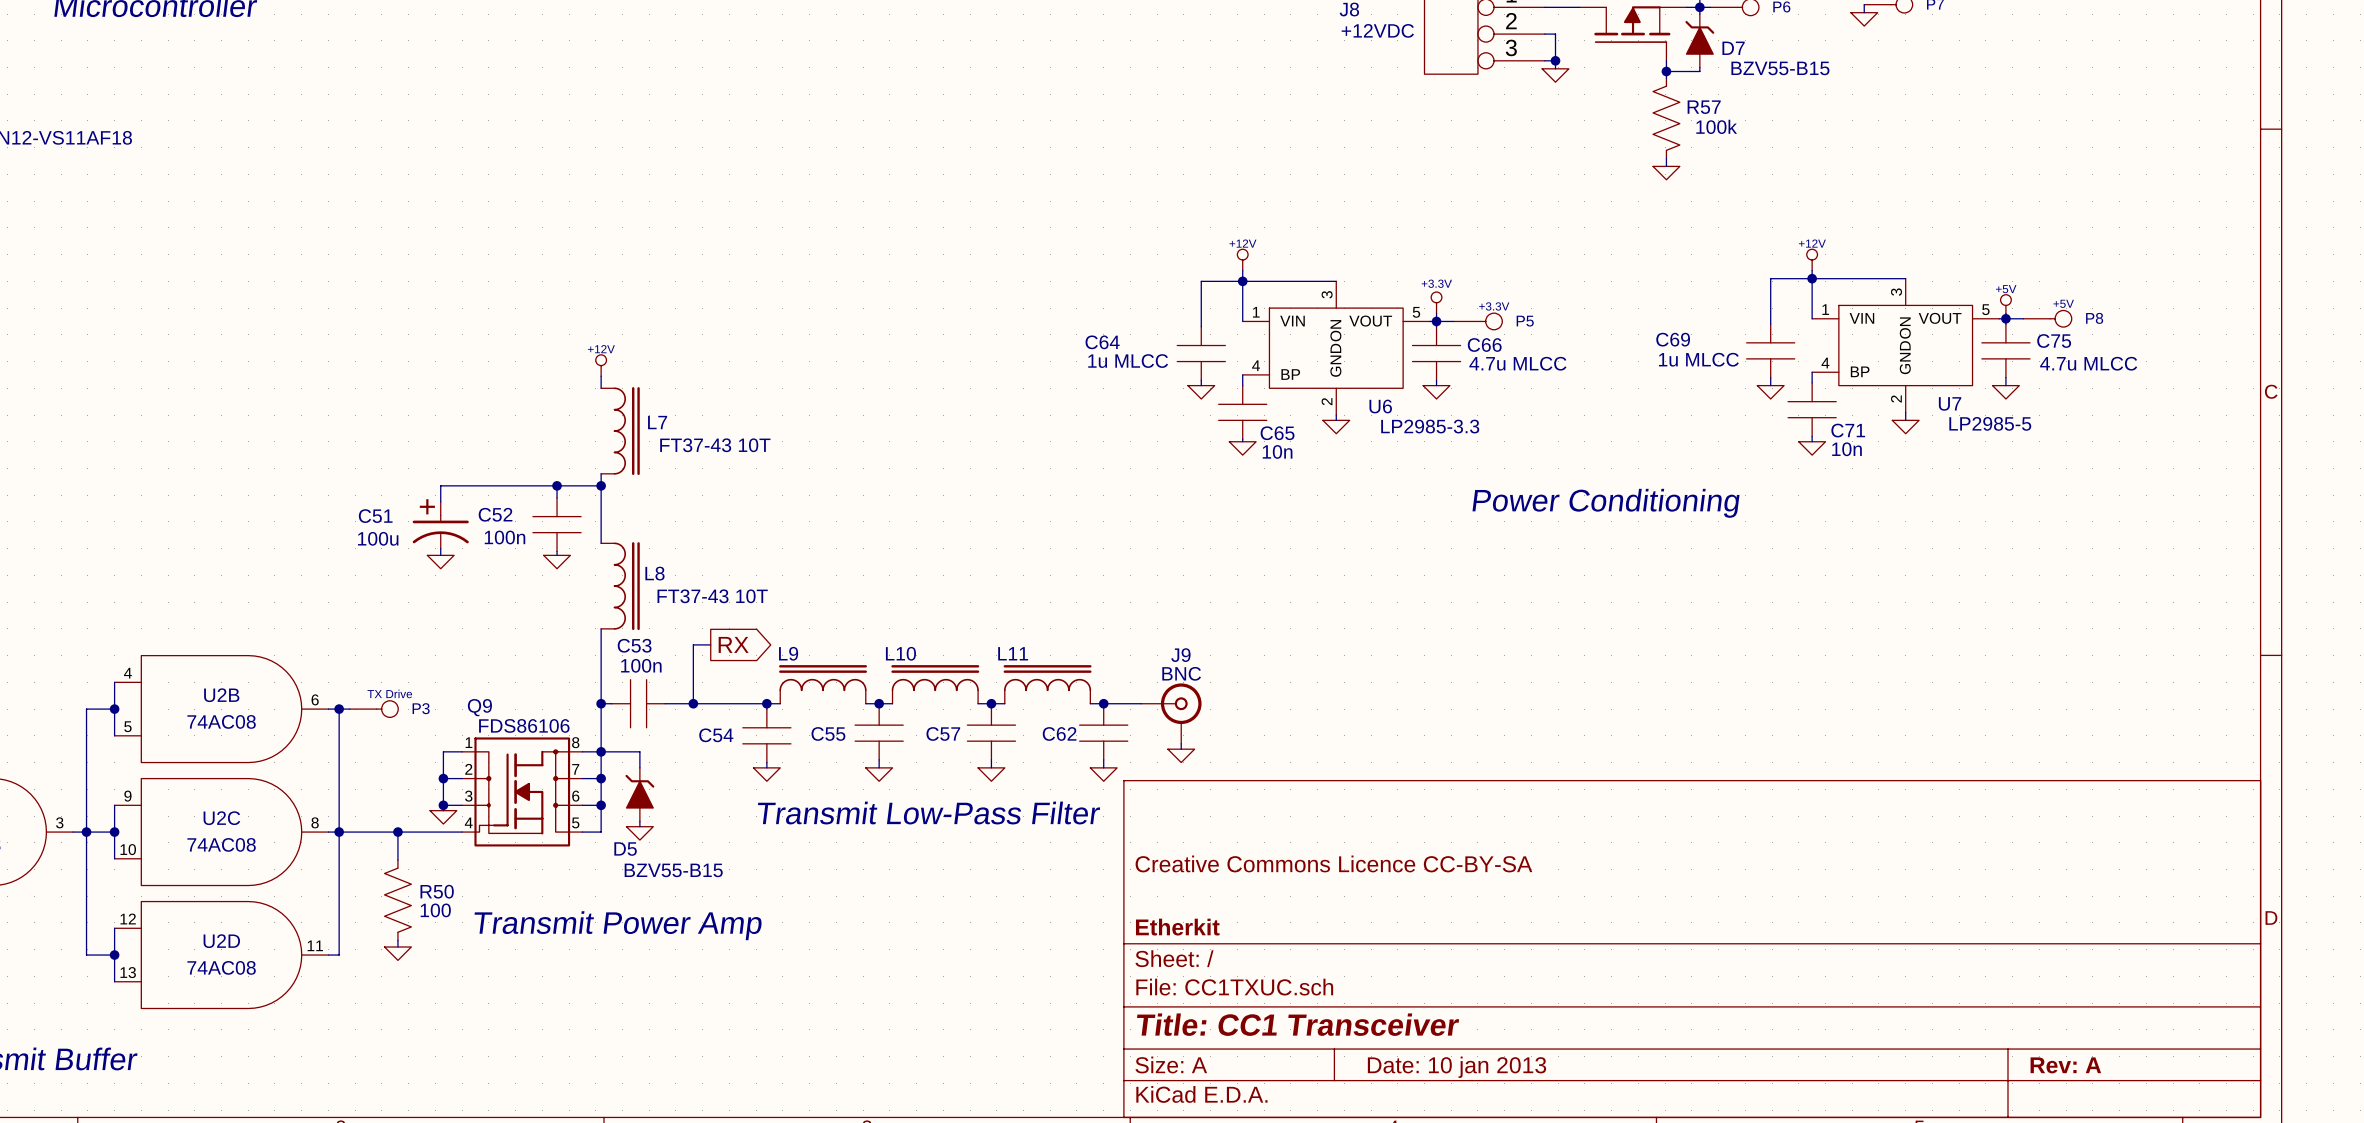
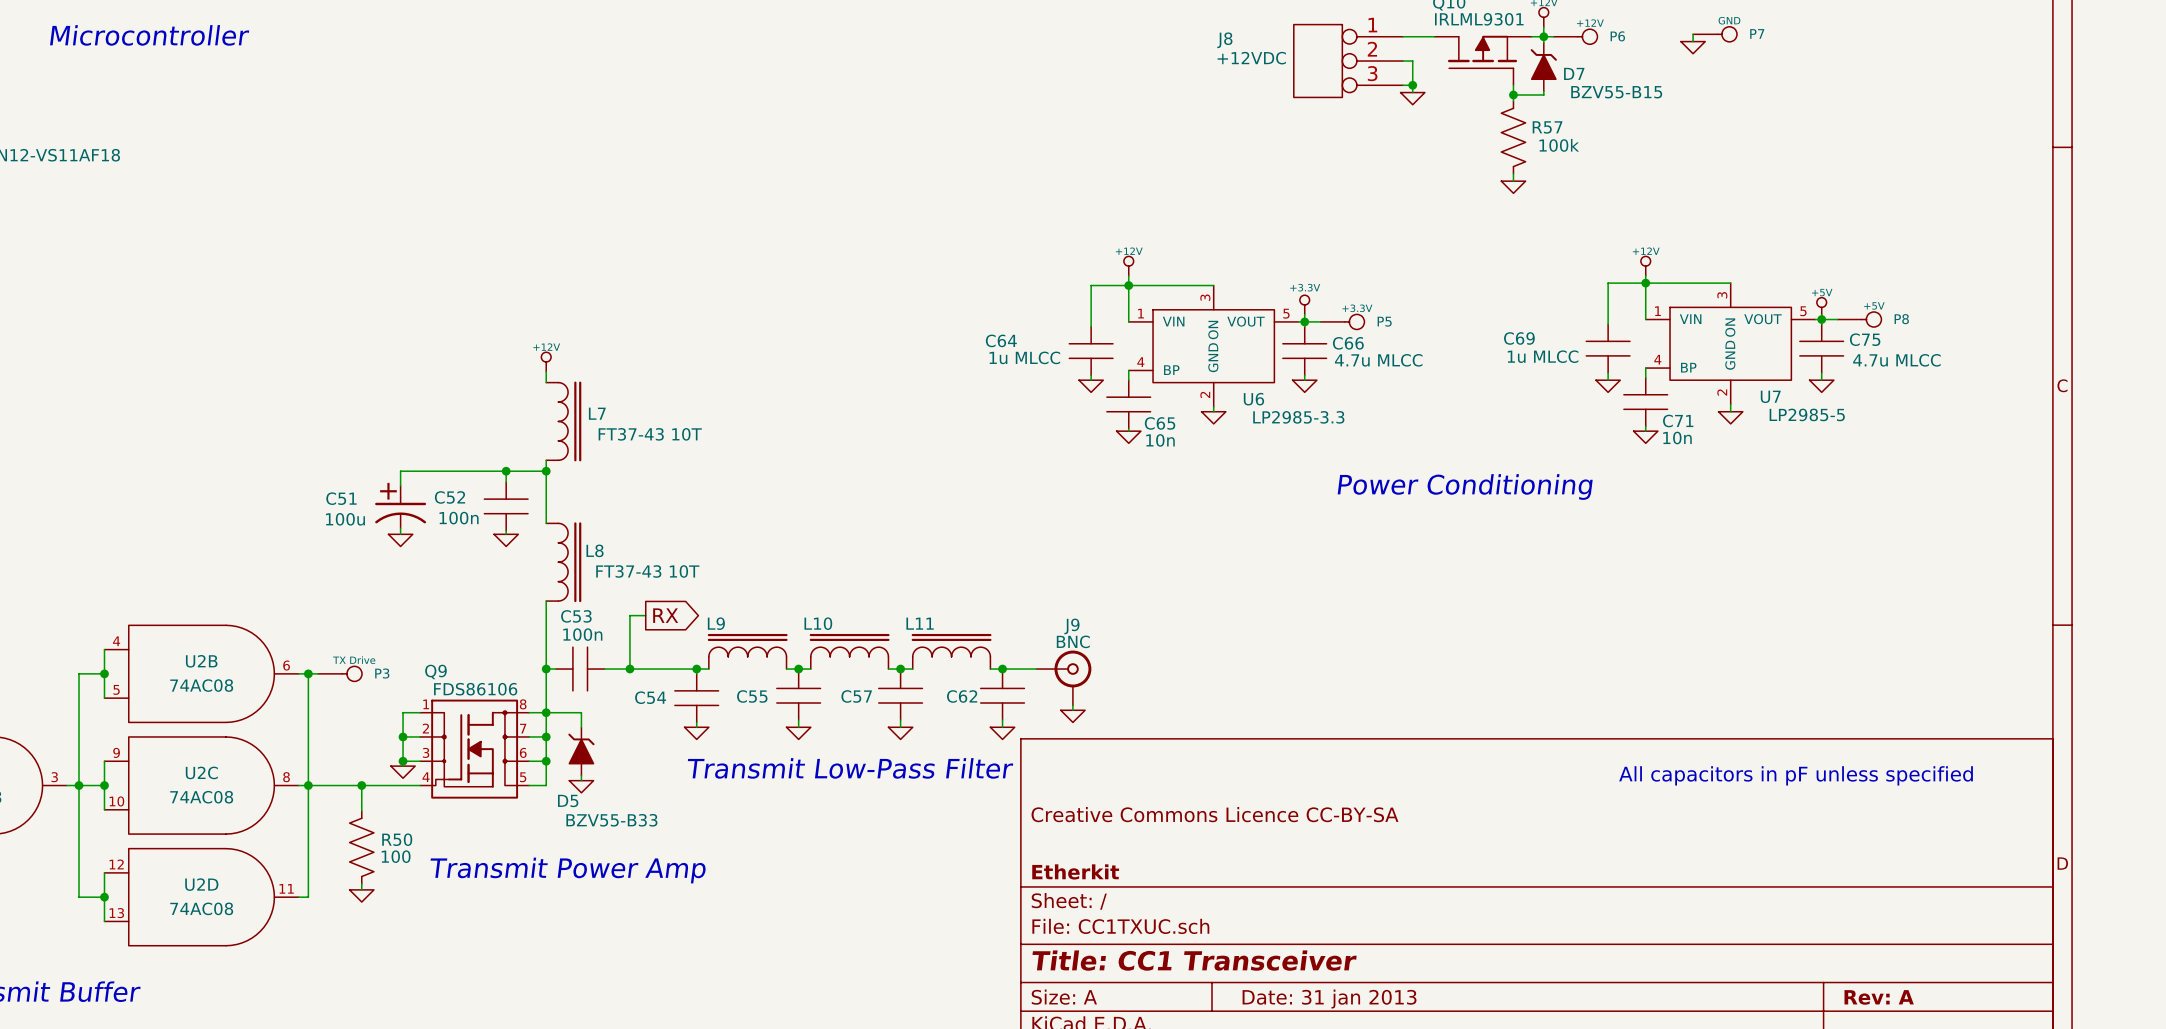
text: none -> All capacitors in pF unless specified (1796, 775)
D5 value: BZV55-B15 (673, 870) -> BZV55-B33 (611, 820)
title block: Date: 10 jan 2013 (1457, 1067) -> Date: 31 jan 2013 (1329, 999)

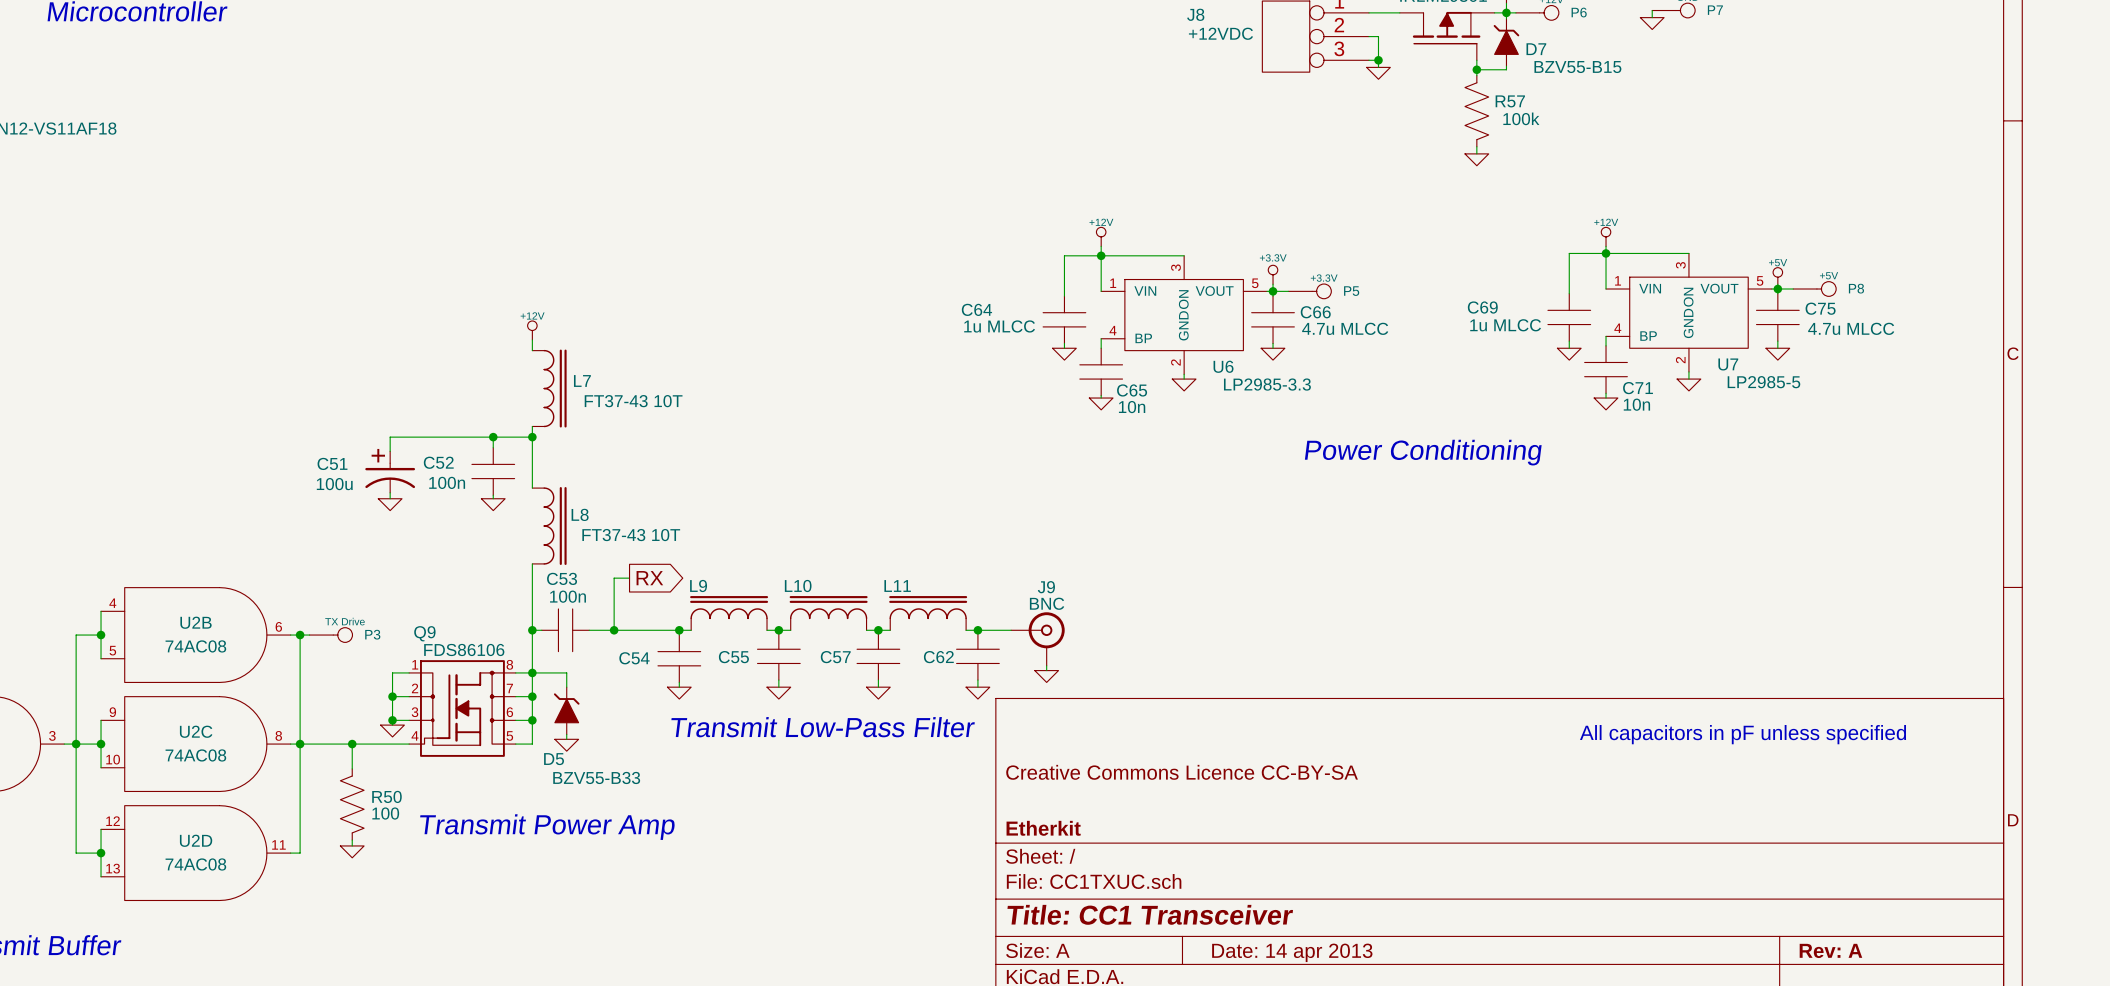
title block: Date: 31 jan 2013 (1329, 999) -> Date: 14 apr 2013 (1292, 952)

